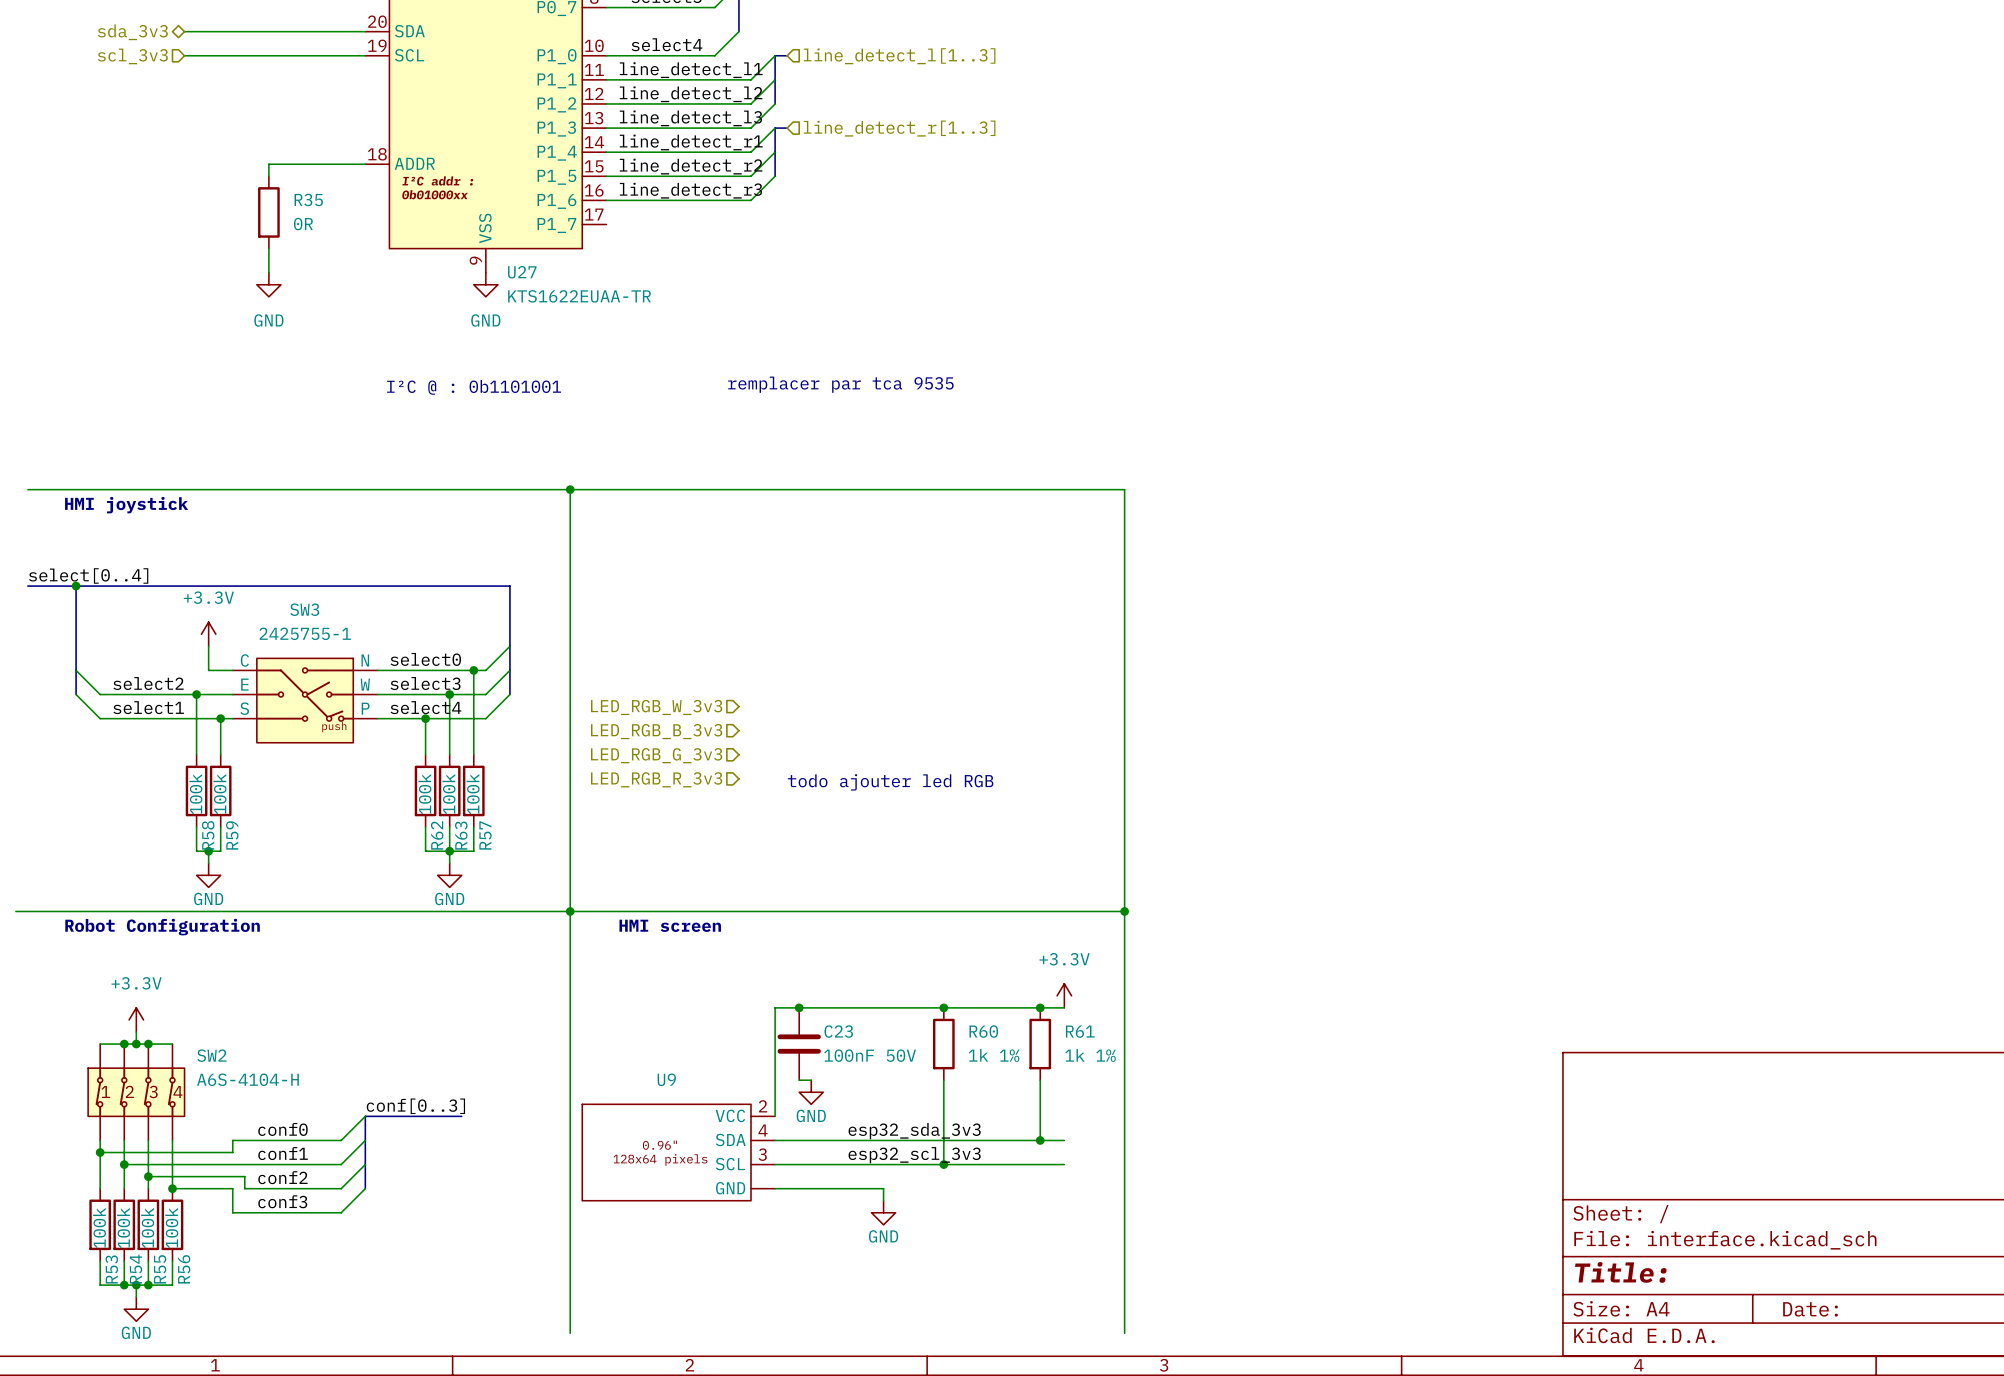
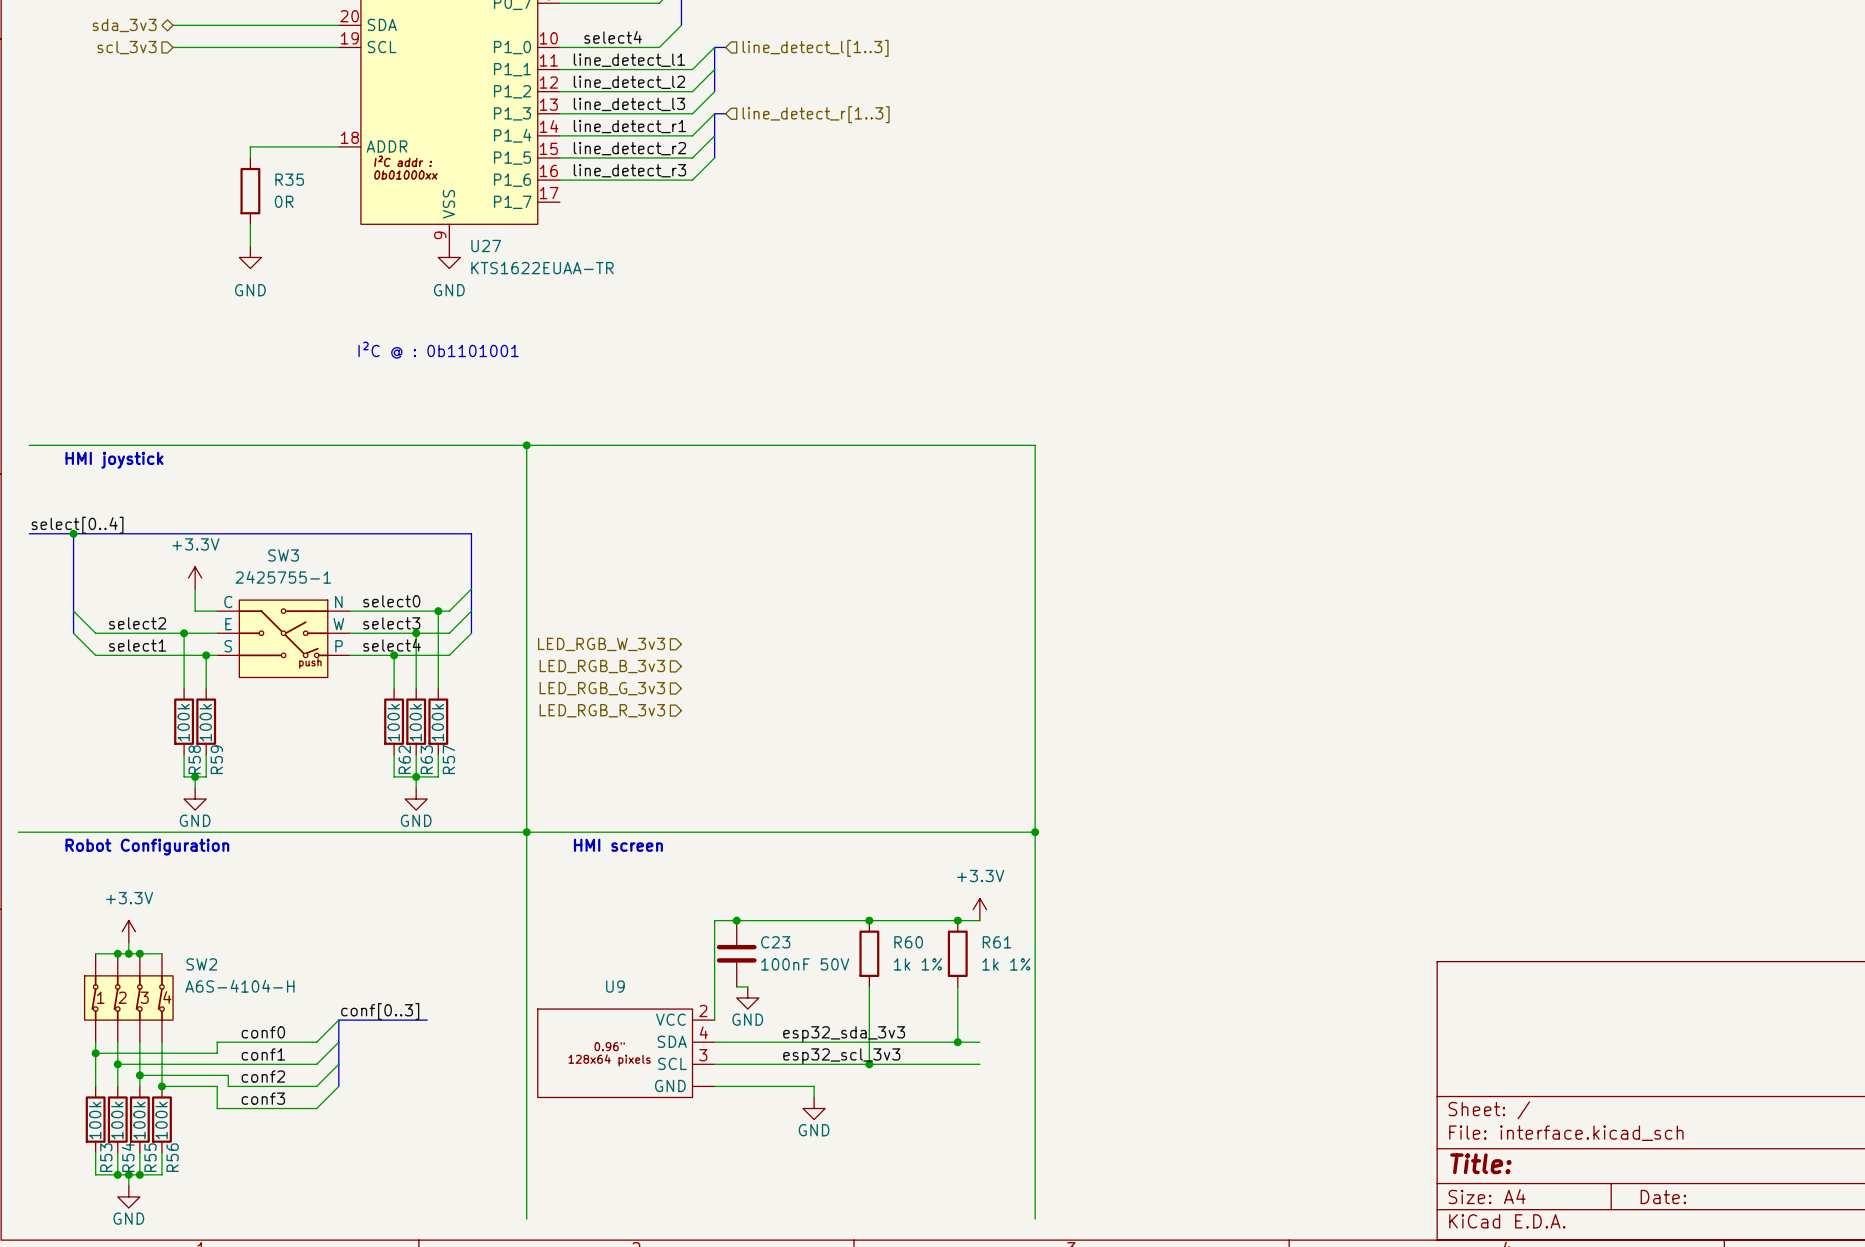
text: remplacer par tca 9535 (840, 384) -> none
text: todo ajouter led RGB (890, 782) -> none

